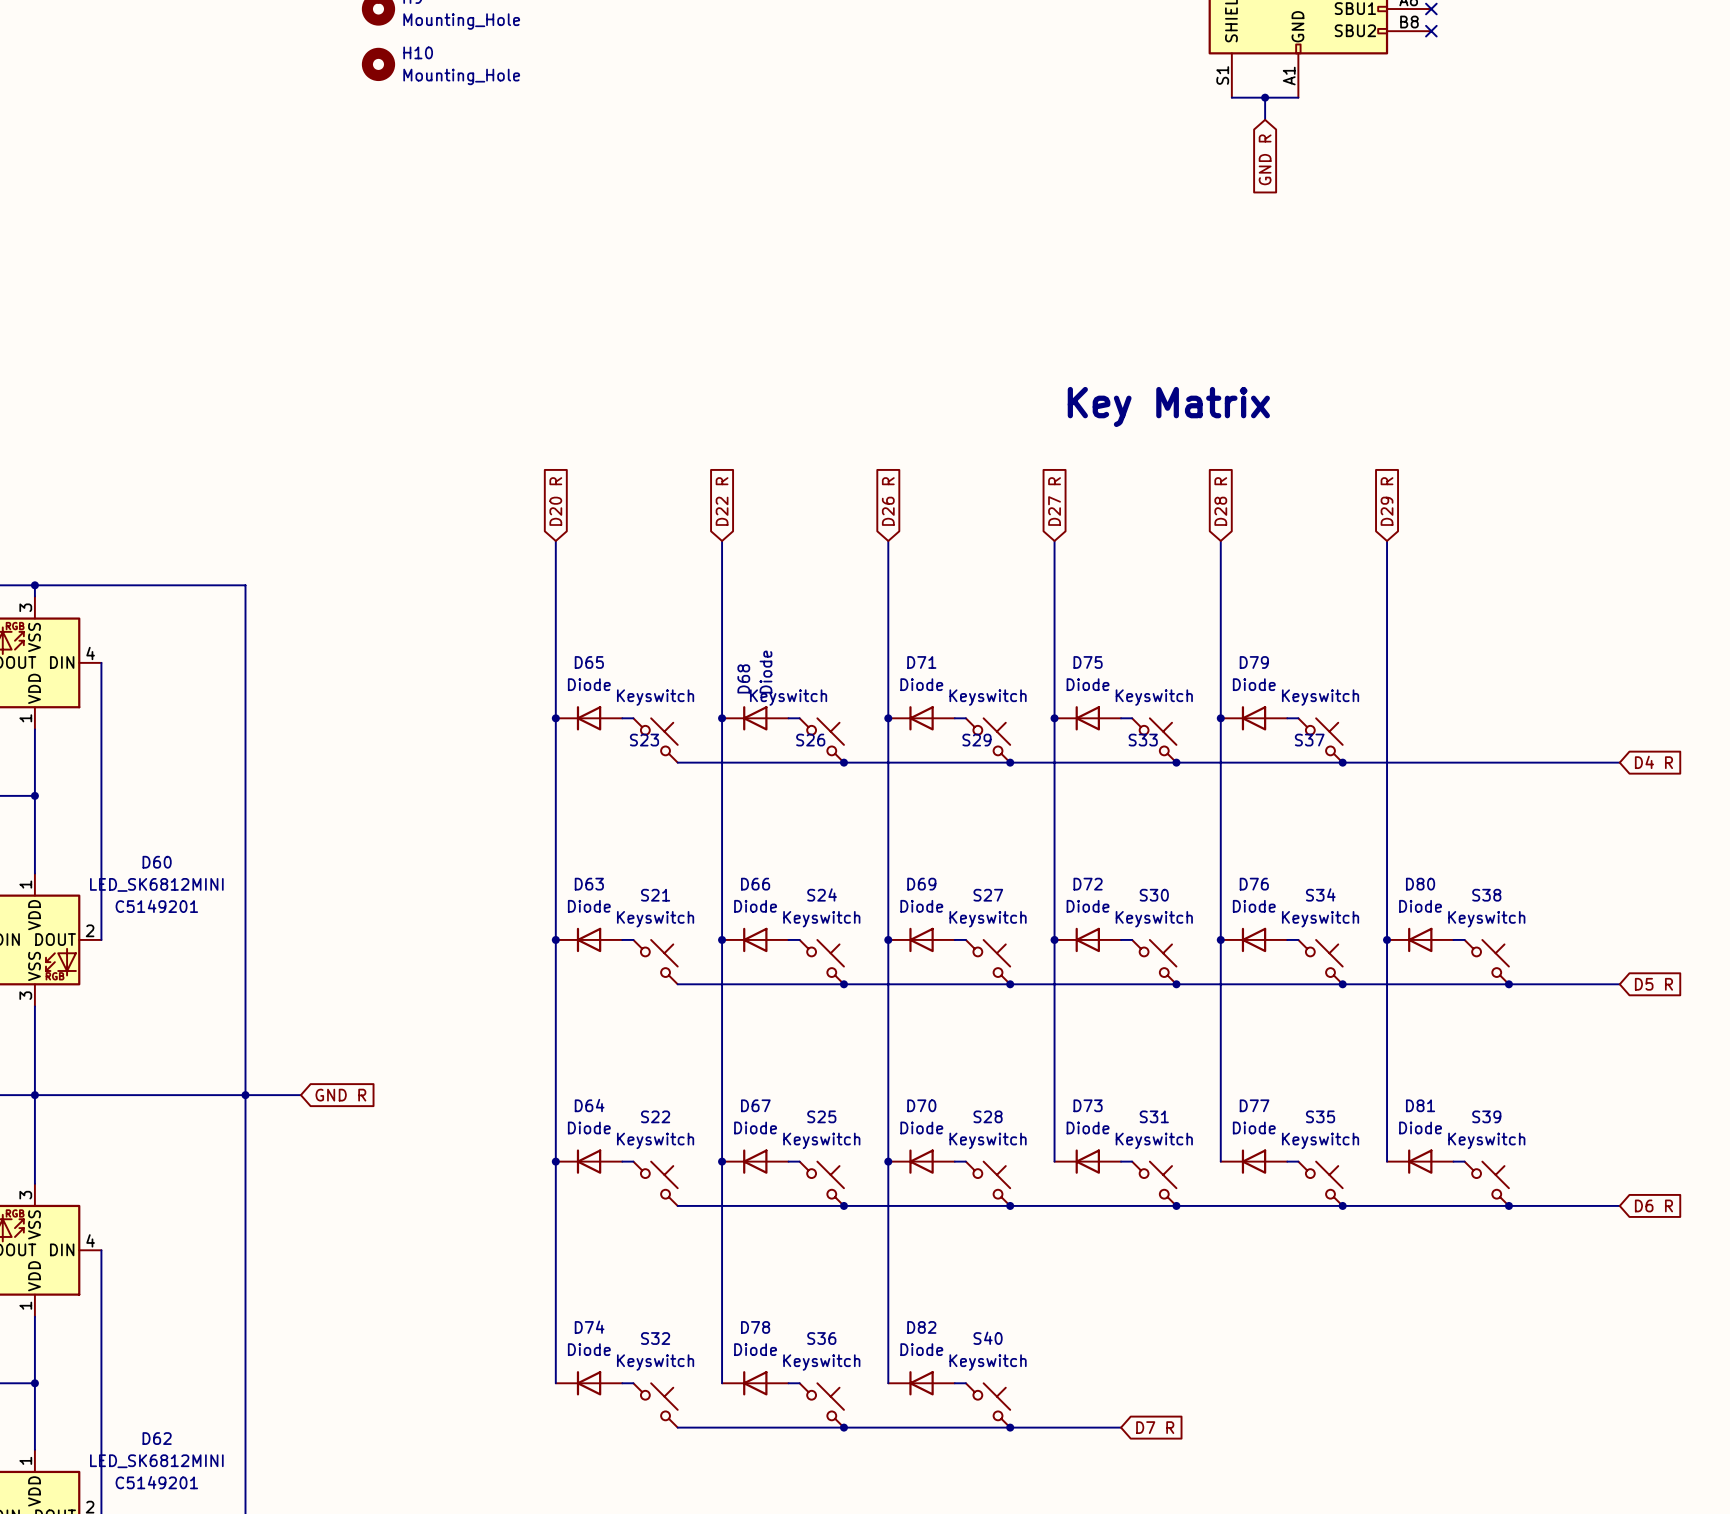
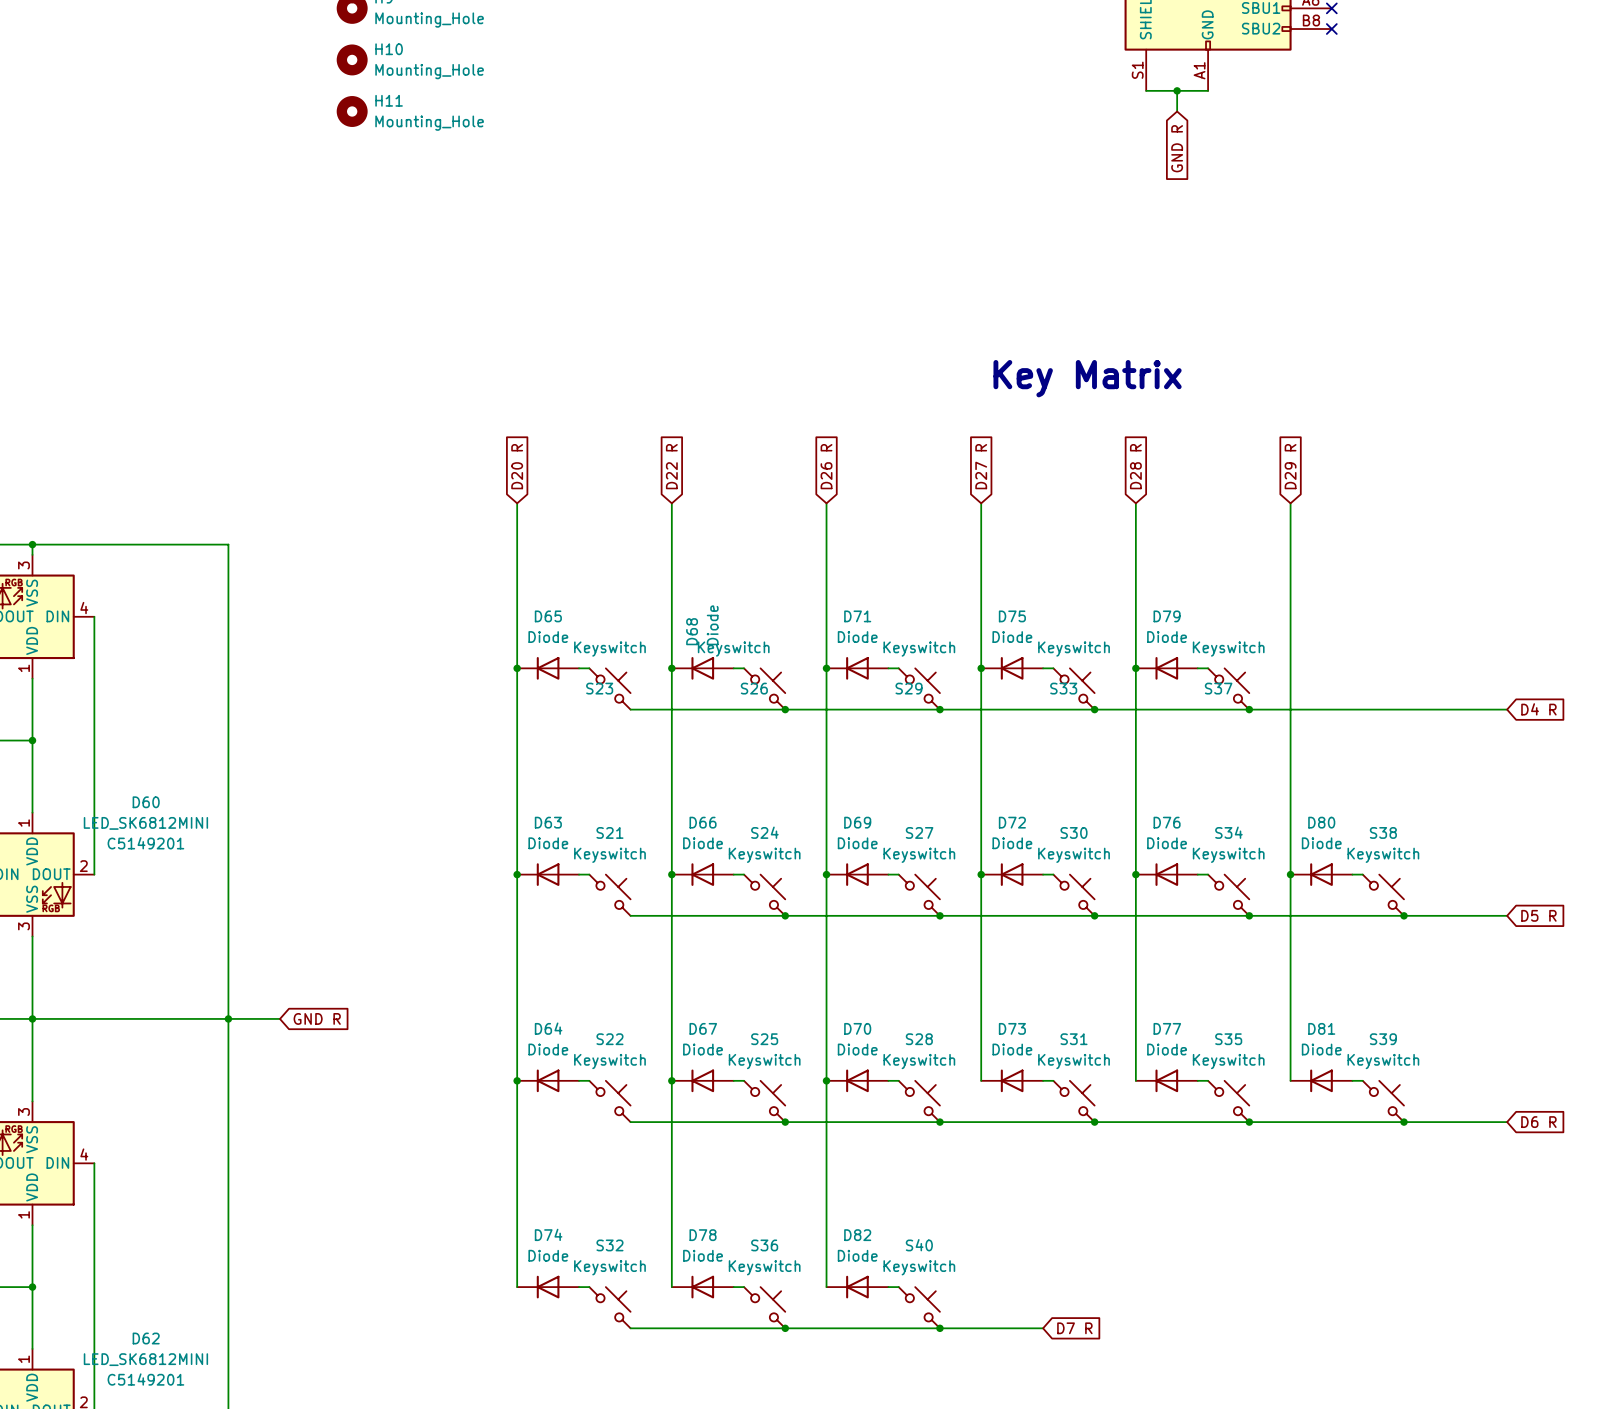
H11: none -> Mounting_Hole (352, 111)

